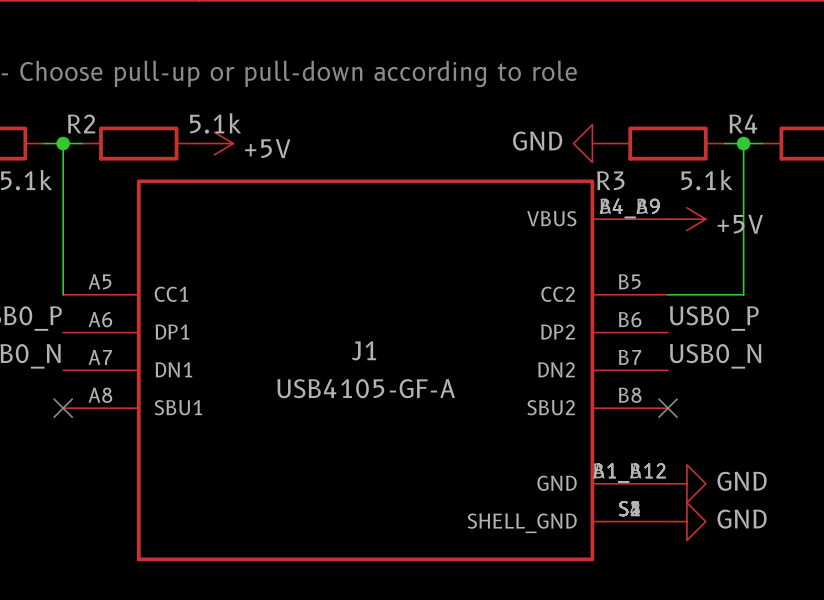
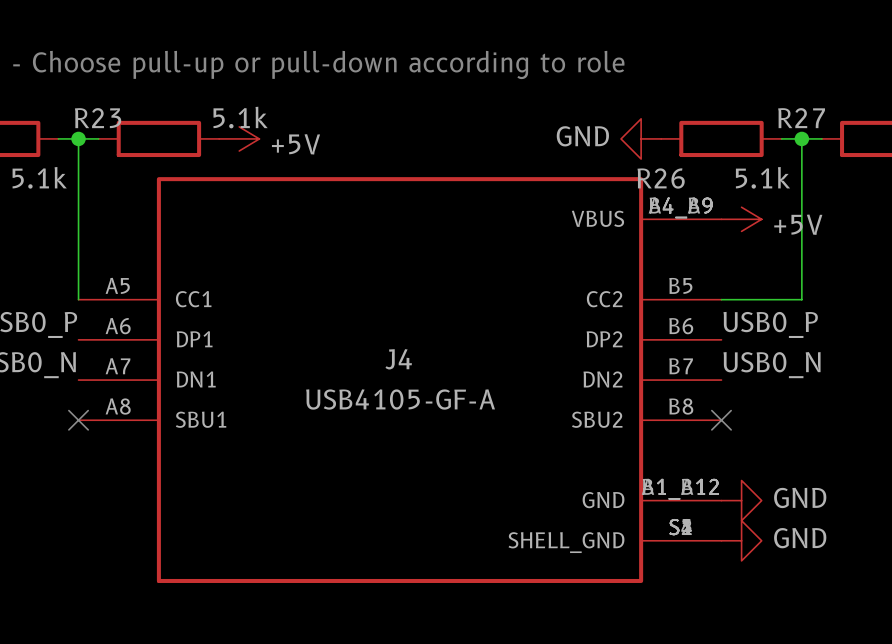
R2 name: R2 (81, 123) -> R23 (98, 118)
R4 name: R4 (743, 123) -> R27 (801, 118)
R3 name: R3 (610, 180) -> R26 (661, 178)
J1 name: J1 (364, 350) -> J4 (398, 359)

